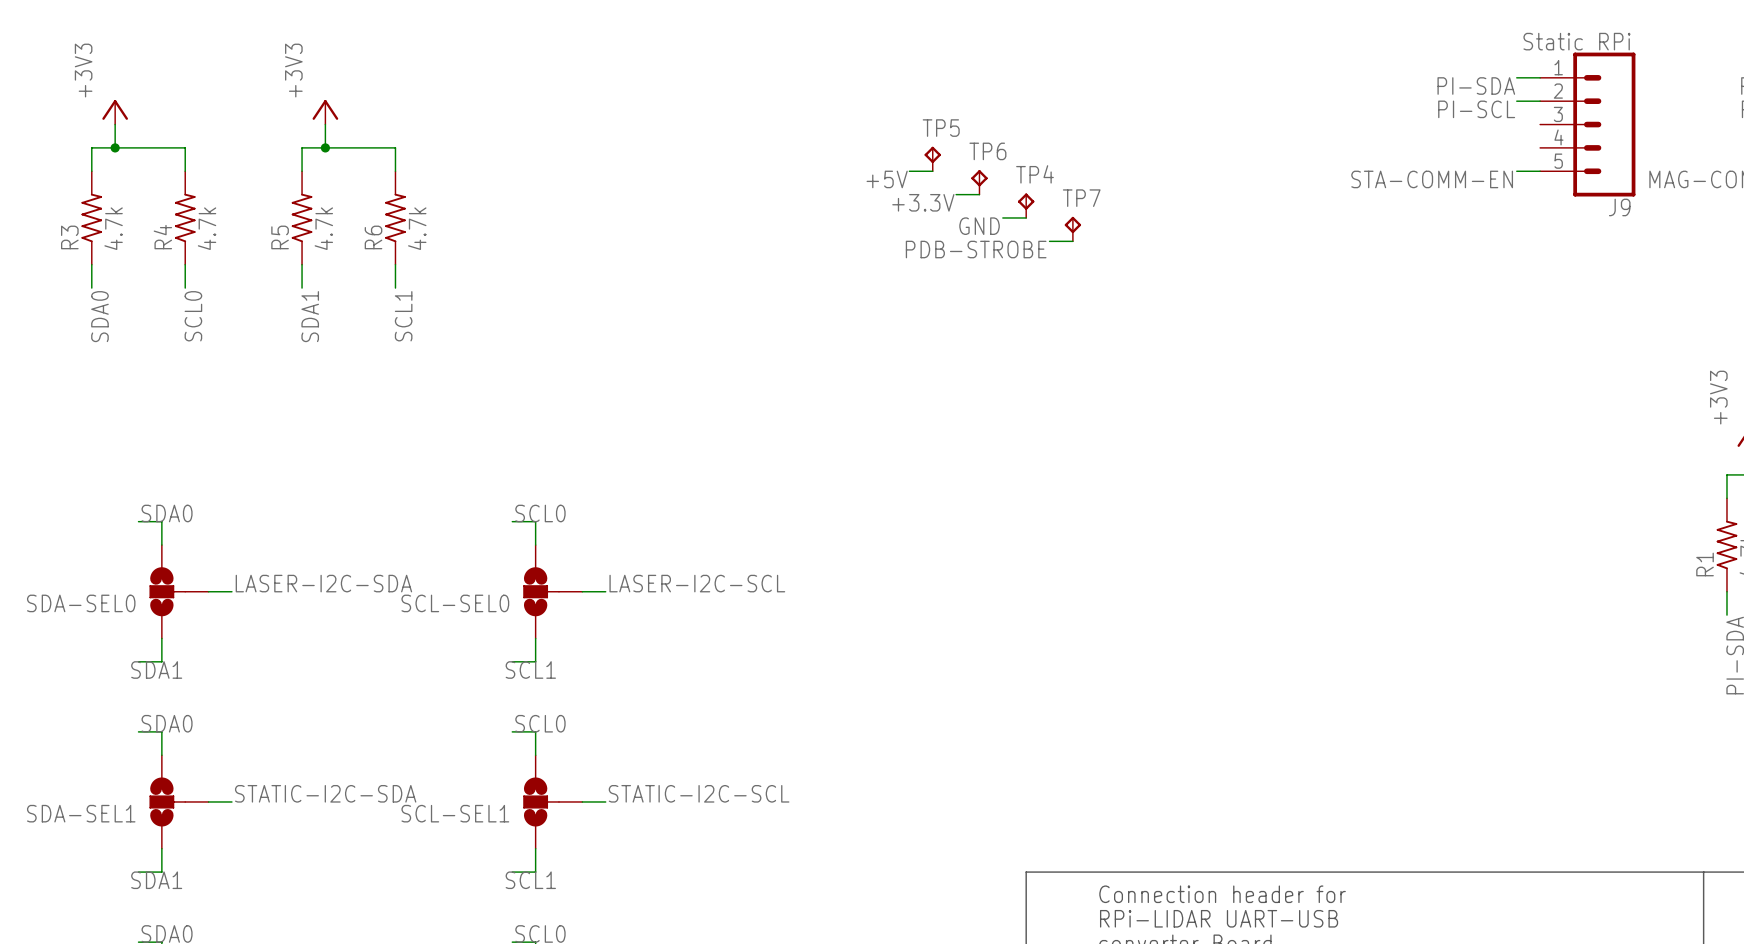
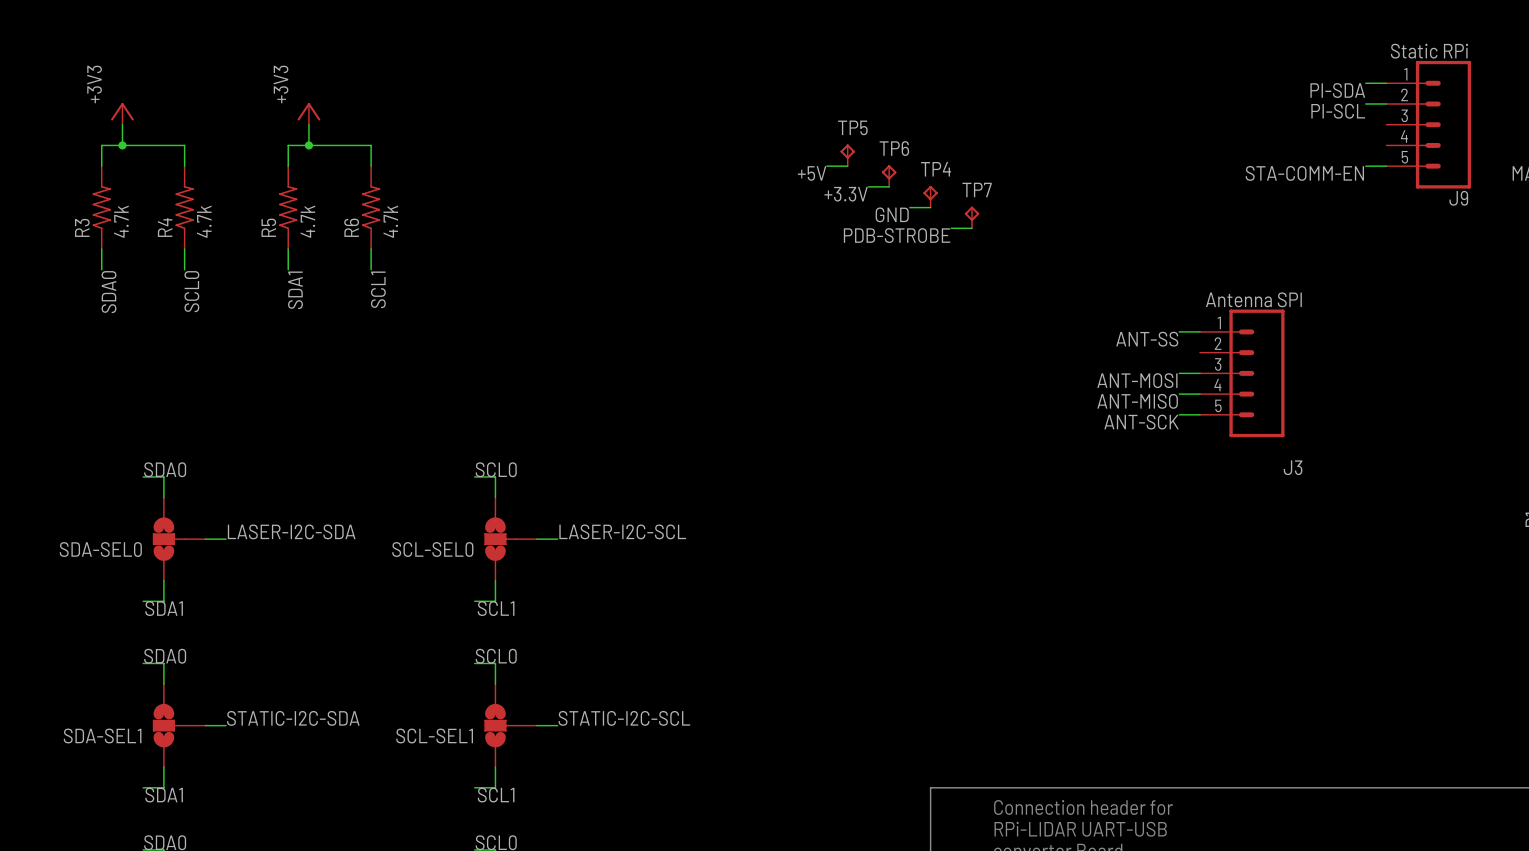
wire: none -> (1179, 331) (1199, 331)
label: none -> ANT-SS (1147, 339)
wire: none -> (1179, 373) (1199, 373)
J3: none -> Antenna SPI (1242, 373)
label: none -> ANT-MOSI (1137, 380)
wire: none -> (1179, 394) (1199, 394)
label: none -> ANT-MISO (1137, 401)
wire: none -> (1179, 414) (1199, 414)
label: none -> ANT-SCK (1141, 422)

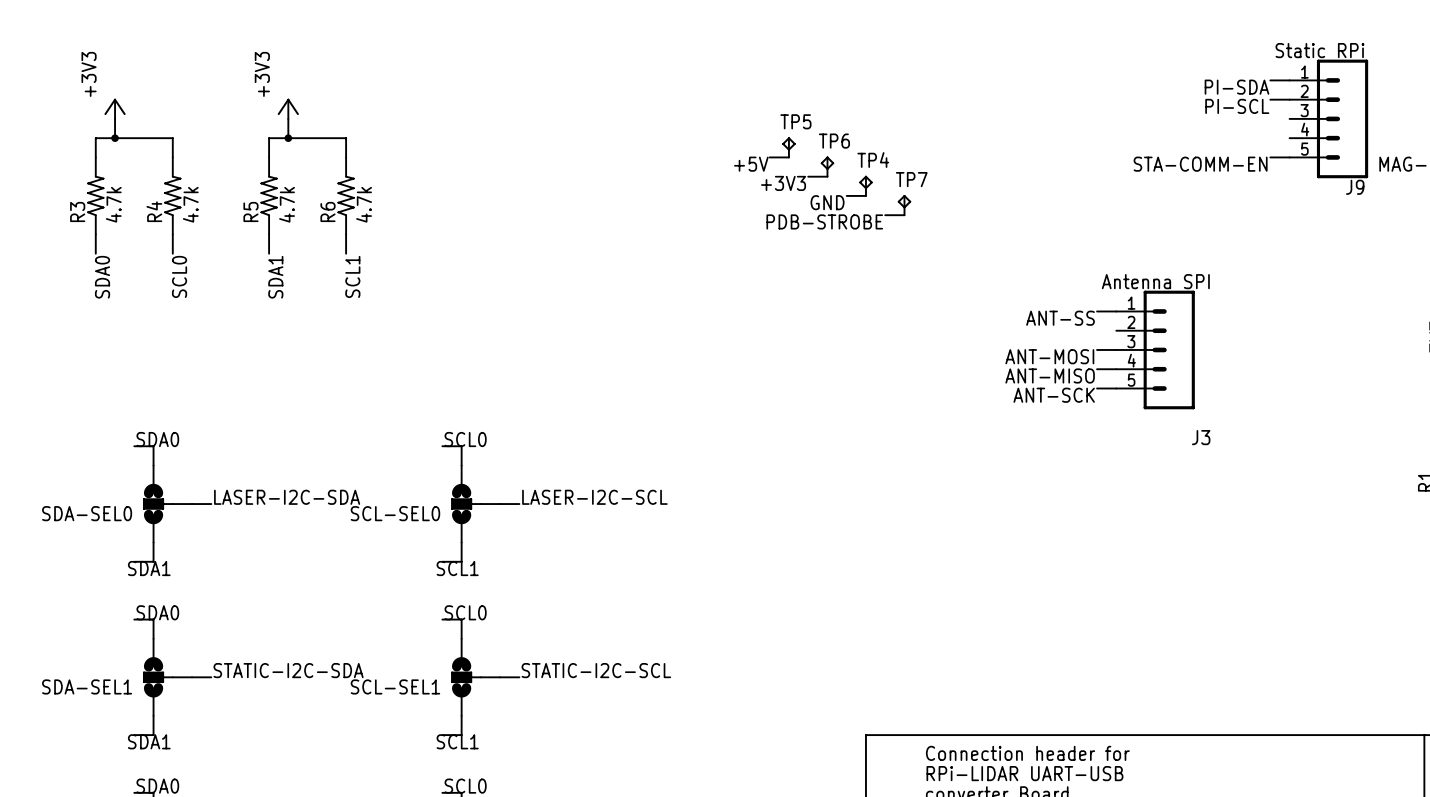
label: +3.3V (846, 194) -> +3V3 (783, 183)

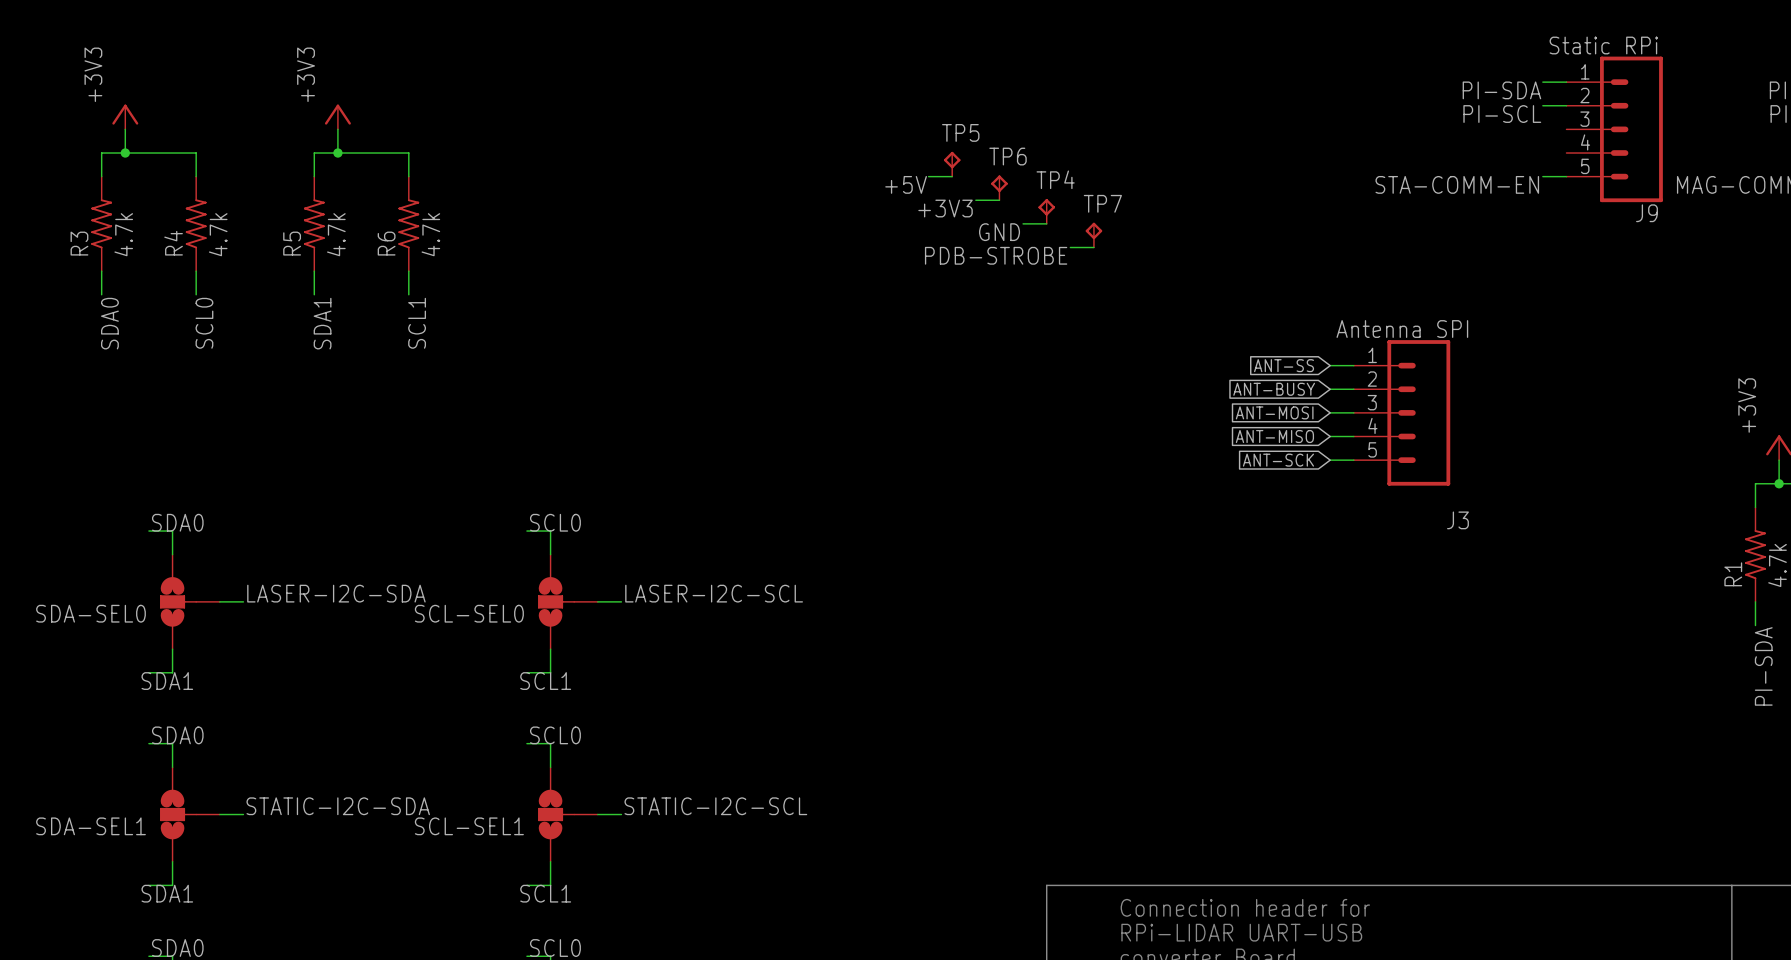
global label: none -> ANT-SS (1284, 365)
label: ANT-SS (1060, 318) -> none
global label: none -> ANT-BUSY (1274, 389)
wire: none -> (1330, 389) (1353, 389)
global label: none -> ANT-MOSI (1274, 412)
label: ANT-MOSI (1049, 356) -> none
global label: none -> ANT-MISO (1274, 436)
label: ANT-MISO (1050, 375) -> none
global label: none -> ANT-SCK (1278, 460)
label: ANT-SCK (1054, 395) -> none

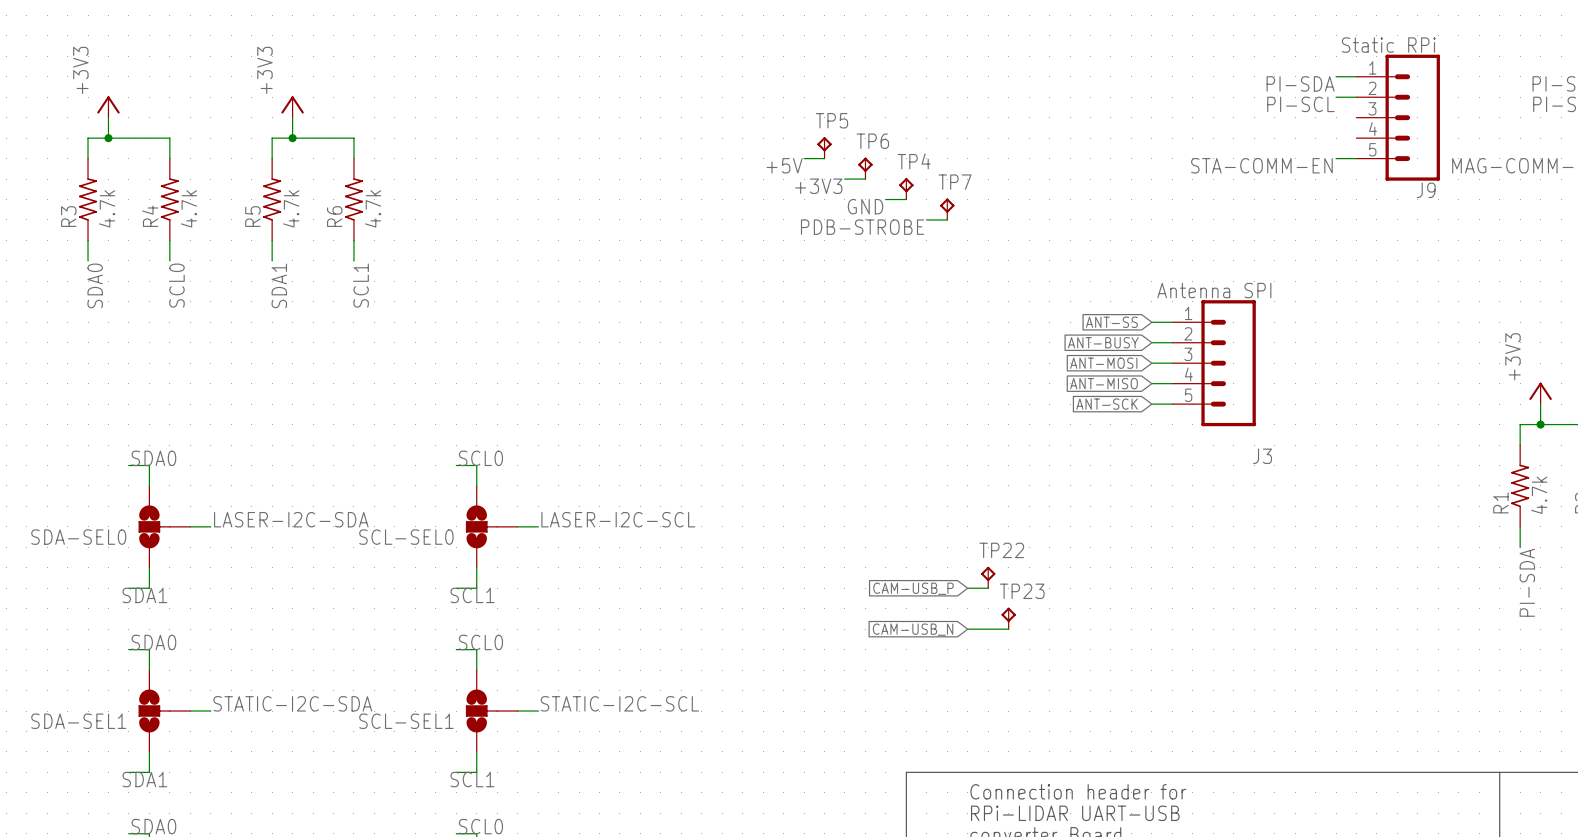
TP22: none -> (988, 577)
wire: none -> (967, 588) (988, 588)
global label: none -> CAM-USB_P (913, 588)
TP23: none -> (1008, 618)
global label: none -> CAM-USB_N (913, 629)
wire: none -> (967, 629) (1008, 629)

